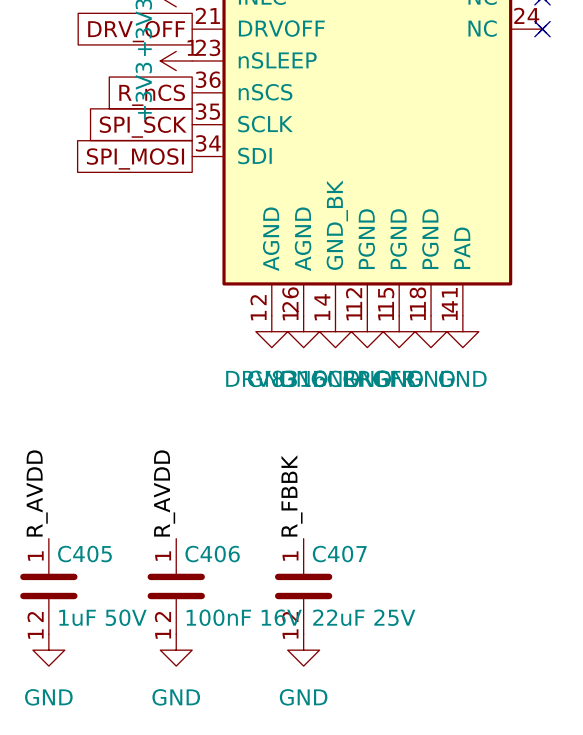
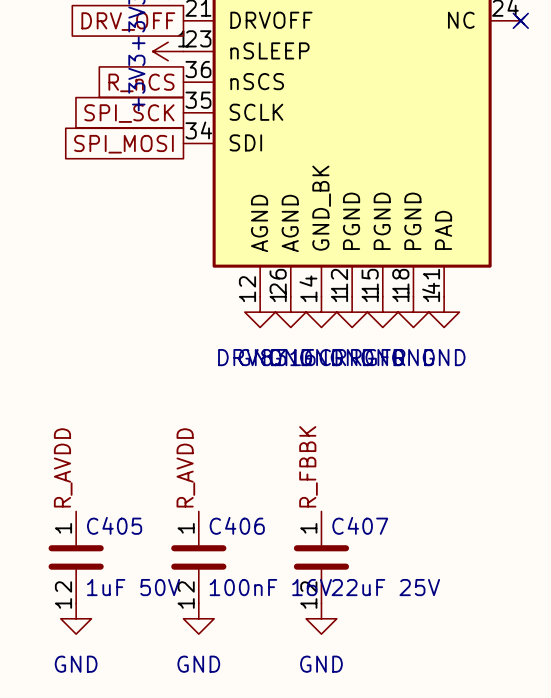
label position: R_AVDD (37, 493) -> R_AVDD (63, 467)
label position: R_AVDD (164, 493) -> R_AVDD (185, 467)
label position: R_FBBK (292, 495) -> R_FBBK (308, 466)
C405 position: (48, 586) -> (76, 557)
C406 position: (176, 586) -> (198, 557)
C407 position: (303, 586) -> (321, 557)
power symbol position: GND (48, 650) -> GND (76, 618)
power symbol position: GND (176, 650) -> GND (198, 618)
power symbol position: GND (303, 650) -> GND (321, 618)

